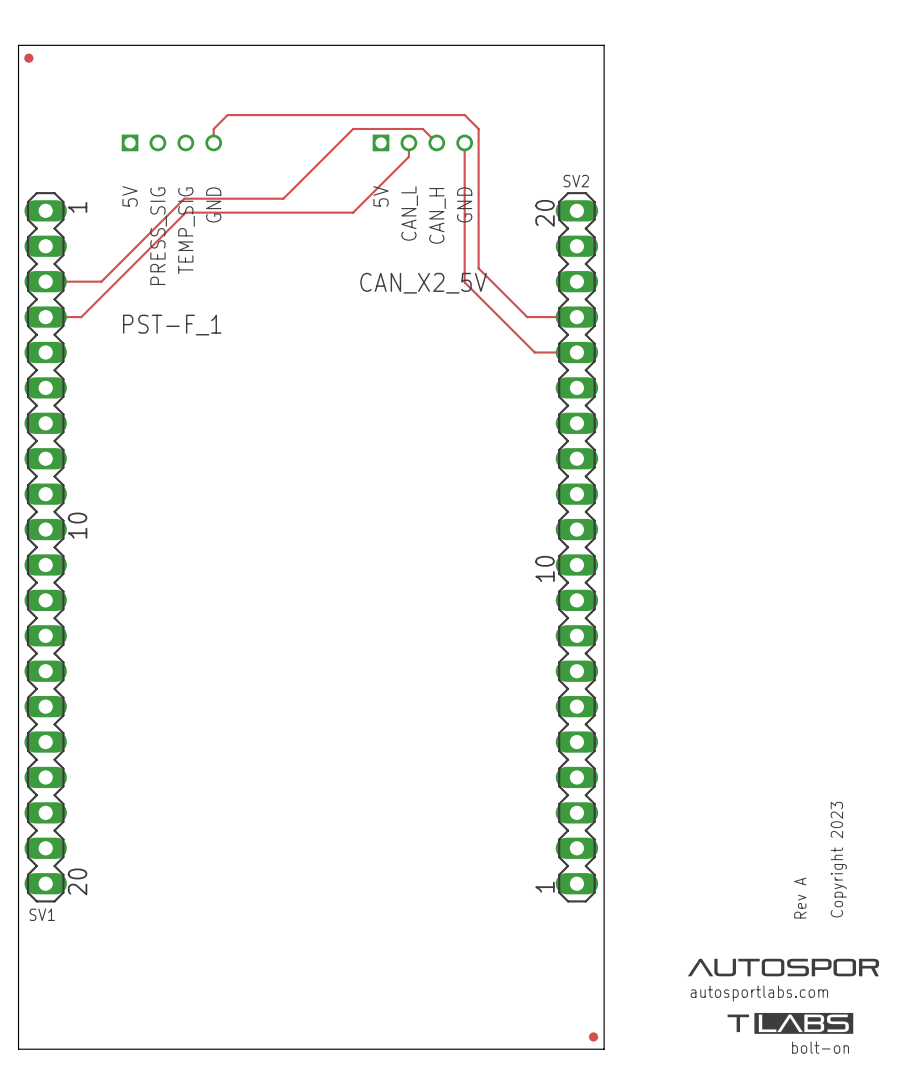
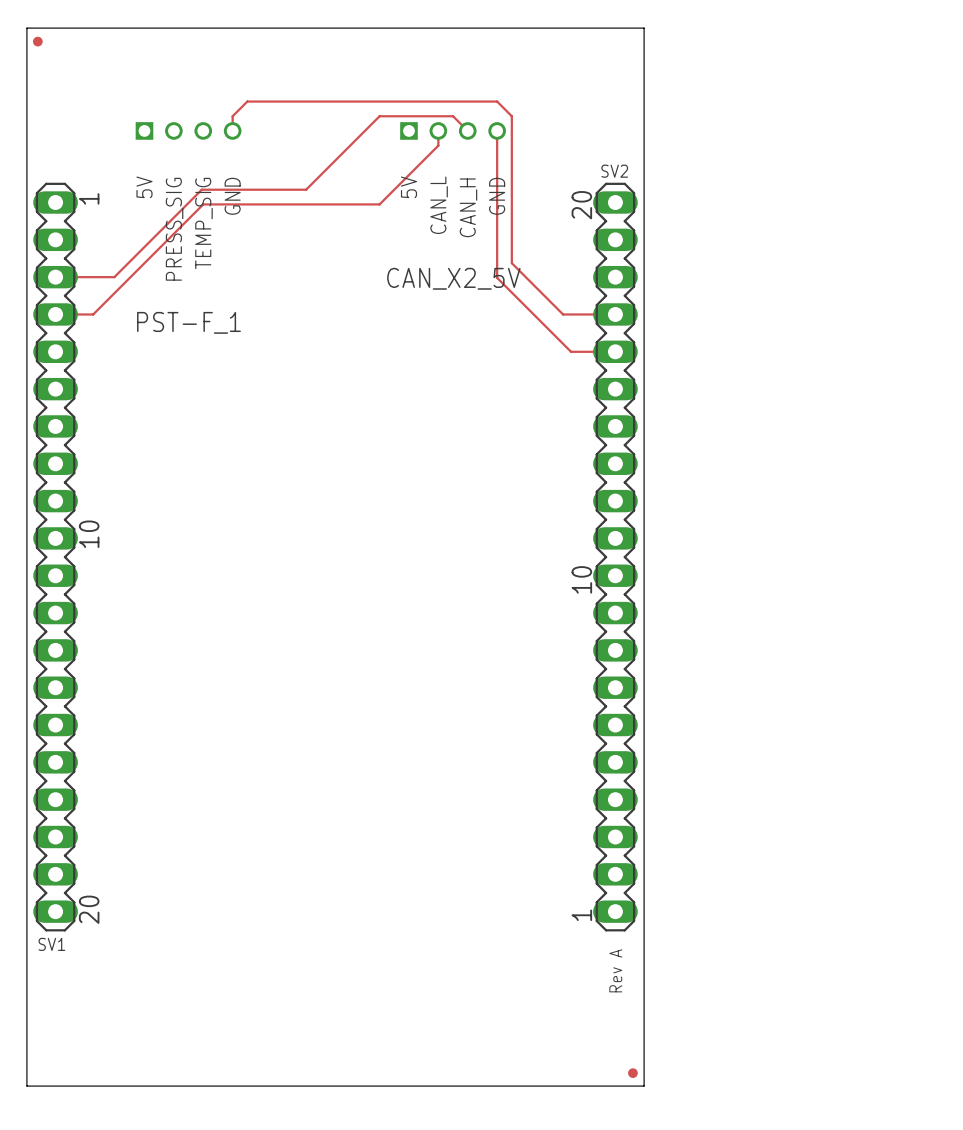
text: Copyright 2023 (838, 859) -> none
text position: Rev A (800, 898) -> Rev A (615, 970)
drawing: [687, 958, 880, 977] -> none
text: autosportlabs.com (759, 993) -> none
drawing: [727, 1012, 854, 1034] -> none
text: bolt-on (820, 1047) -> none

